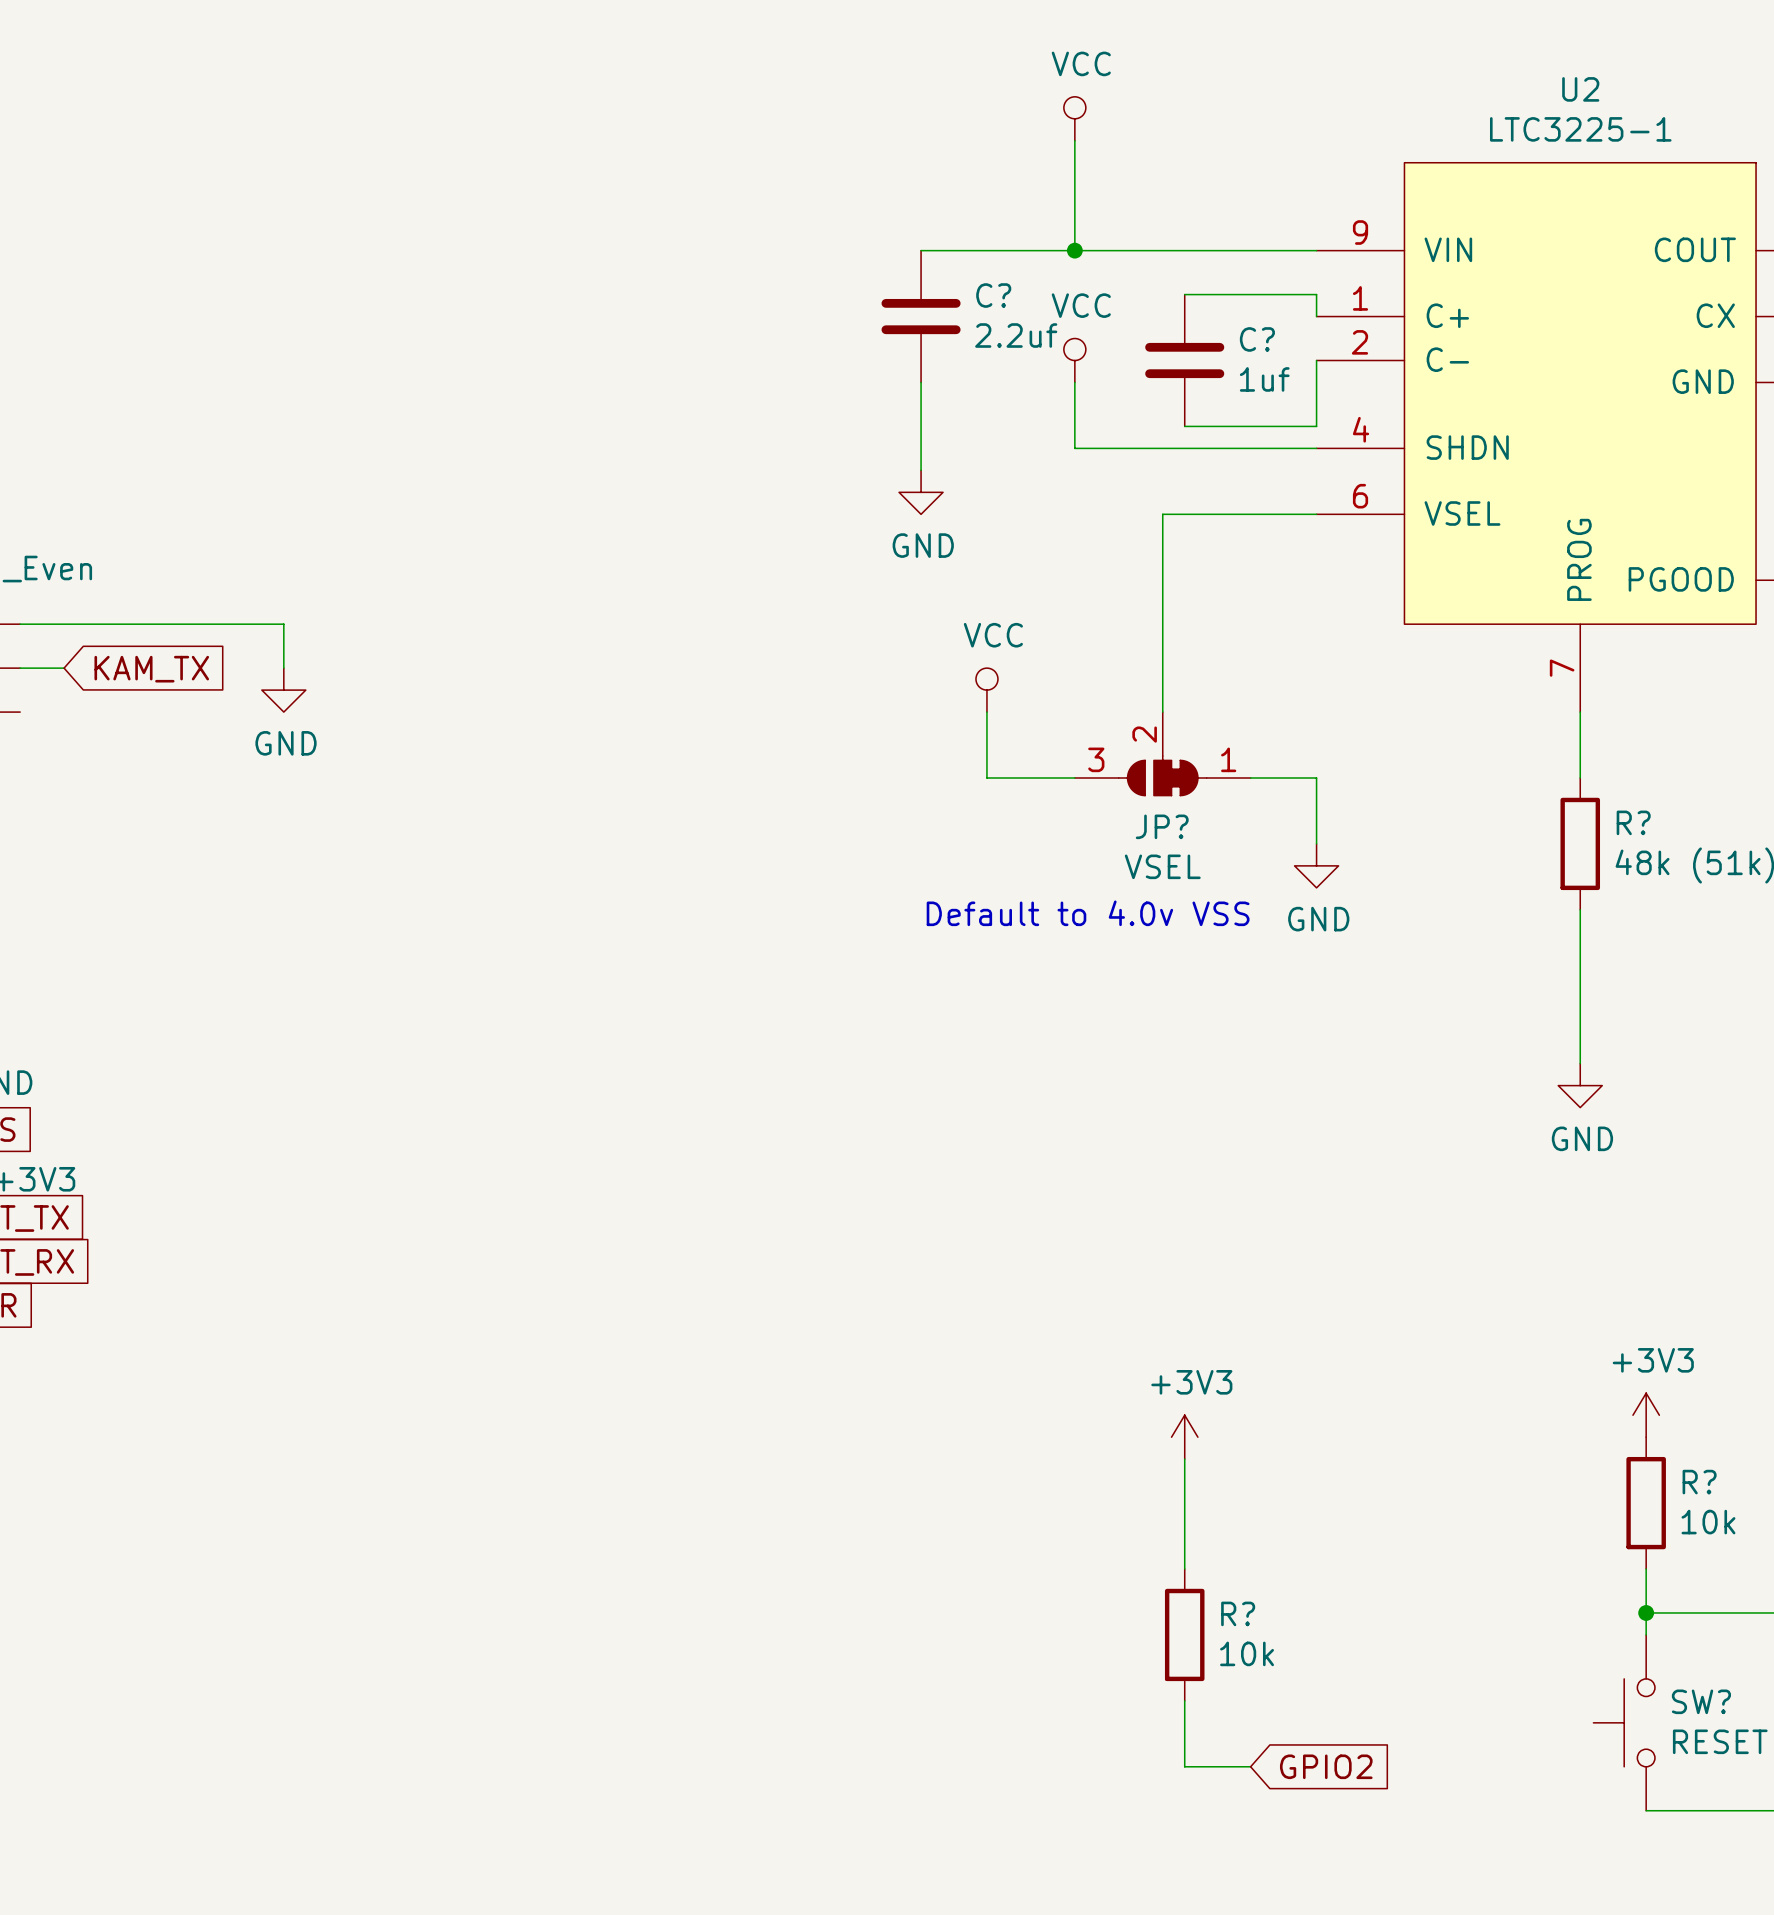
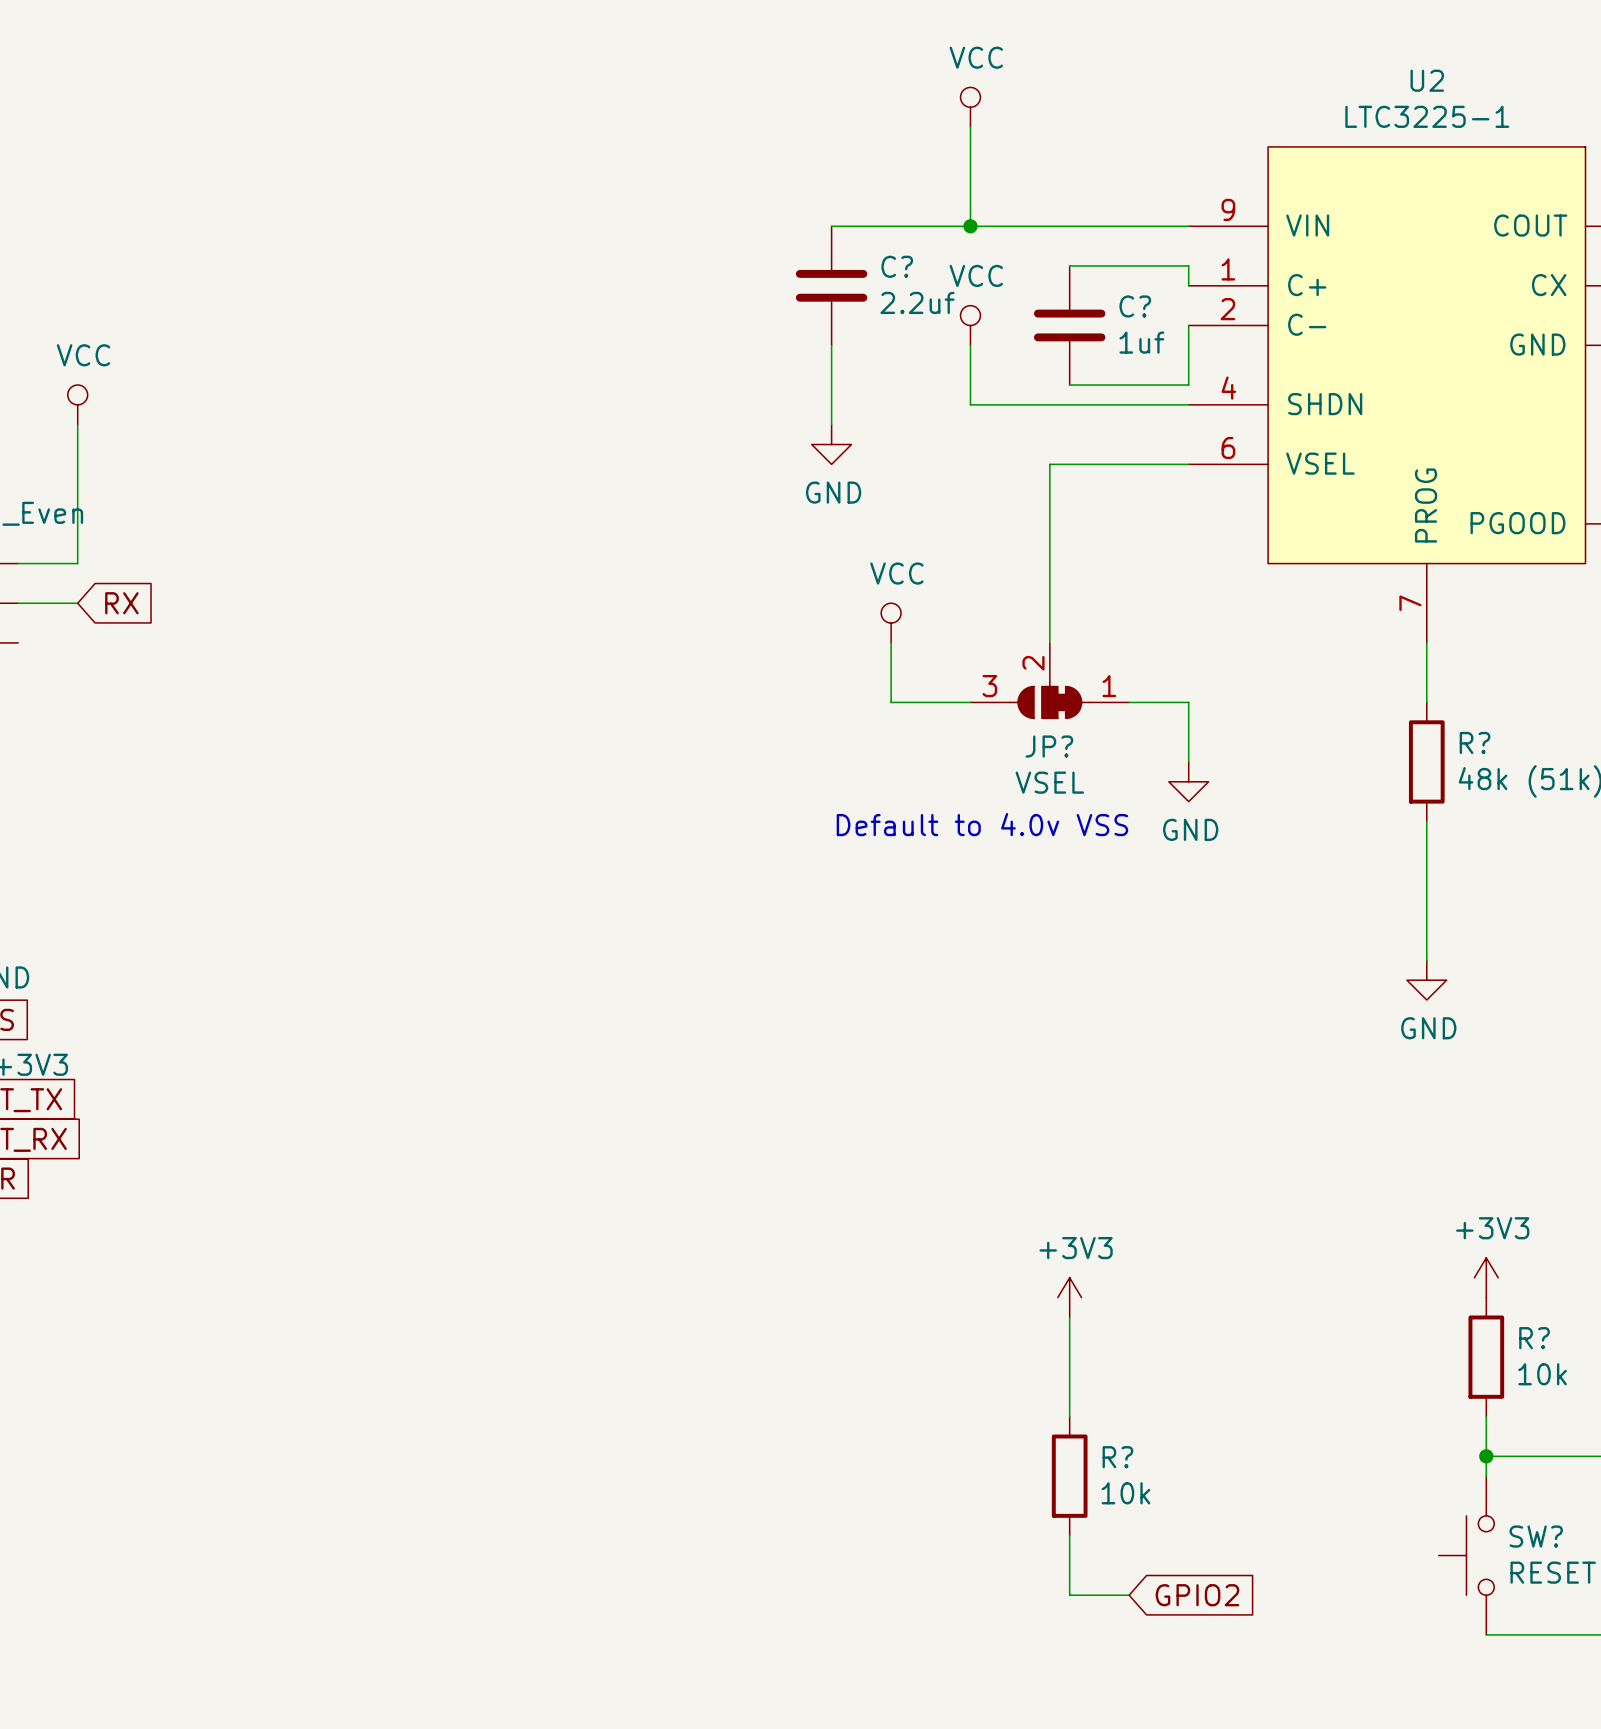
power symbol: none -> VCC (77, 404)
wire: (86, 624) (283, 624) (283, 668) -> (77, 563) (77, 424)
wire: none -> (57, 603) (77, 603)
global label: none -> RX (121, 603)
global label: KAM_TX (151, 669) -> none
power symbol: GND (283, 690) -> none

